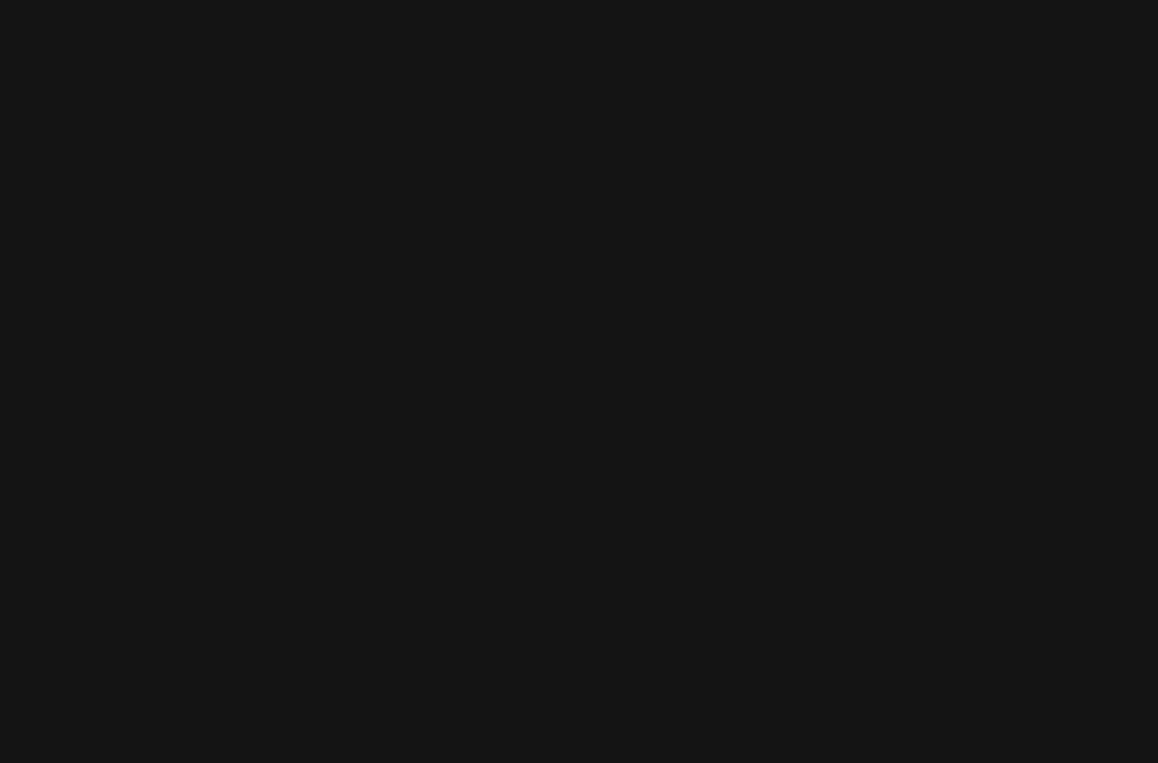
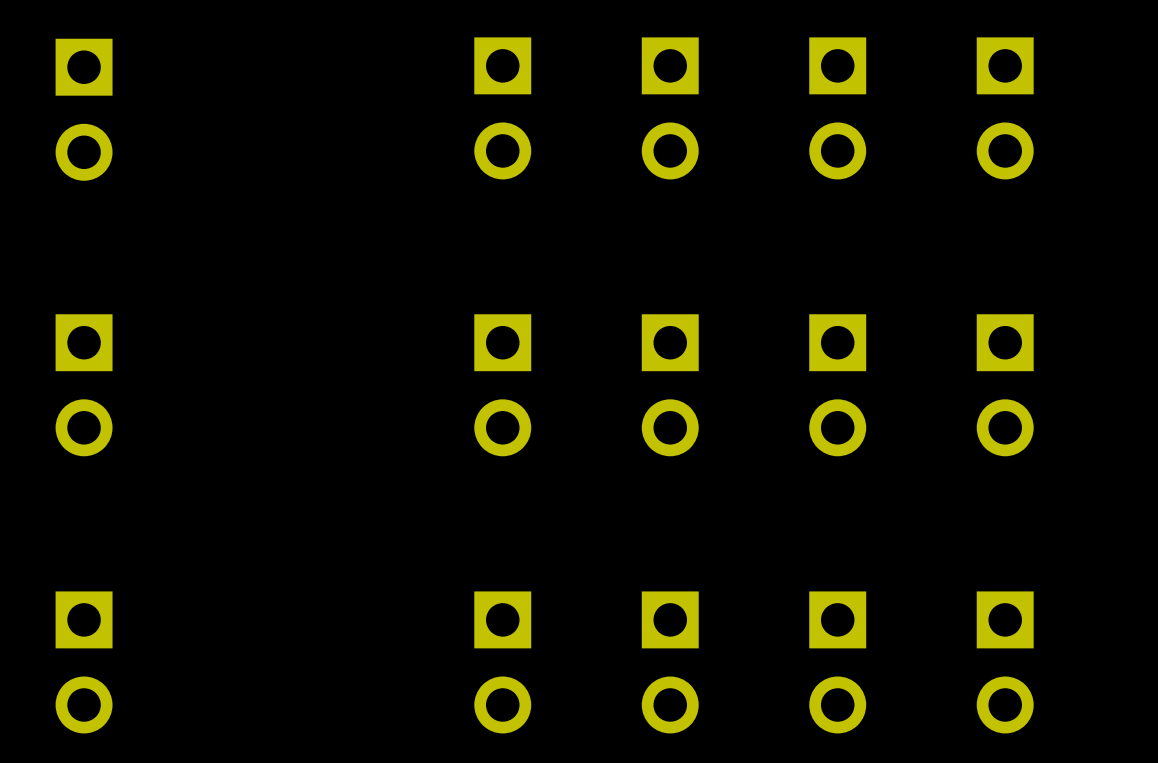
part: none -> (502, 108)
part: none -> (670, 108)
part: none -> (837, 108)
part: none -> (1005, 108)
part: none -> (84, 109)
part: none -> (84, 385)
part: none -> (502, 385)
part: none -> (670, 385)
part: none -> (837, 385)
part: none -> (1005, 385)
part: none -> (84, 662)
part: none -> (502, 662)
part: none -> (670, 662)
part: none -> (837, 662)
part: none -> (1005, 662)

